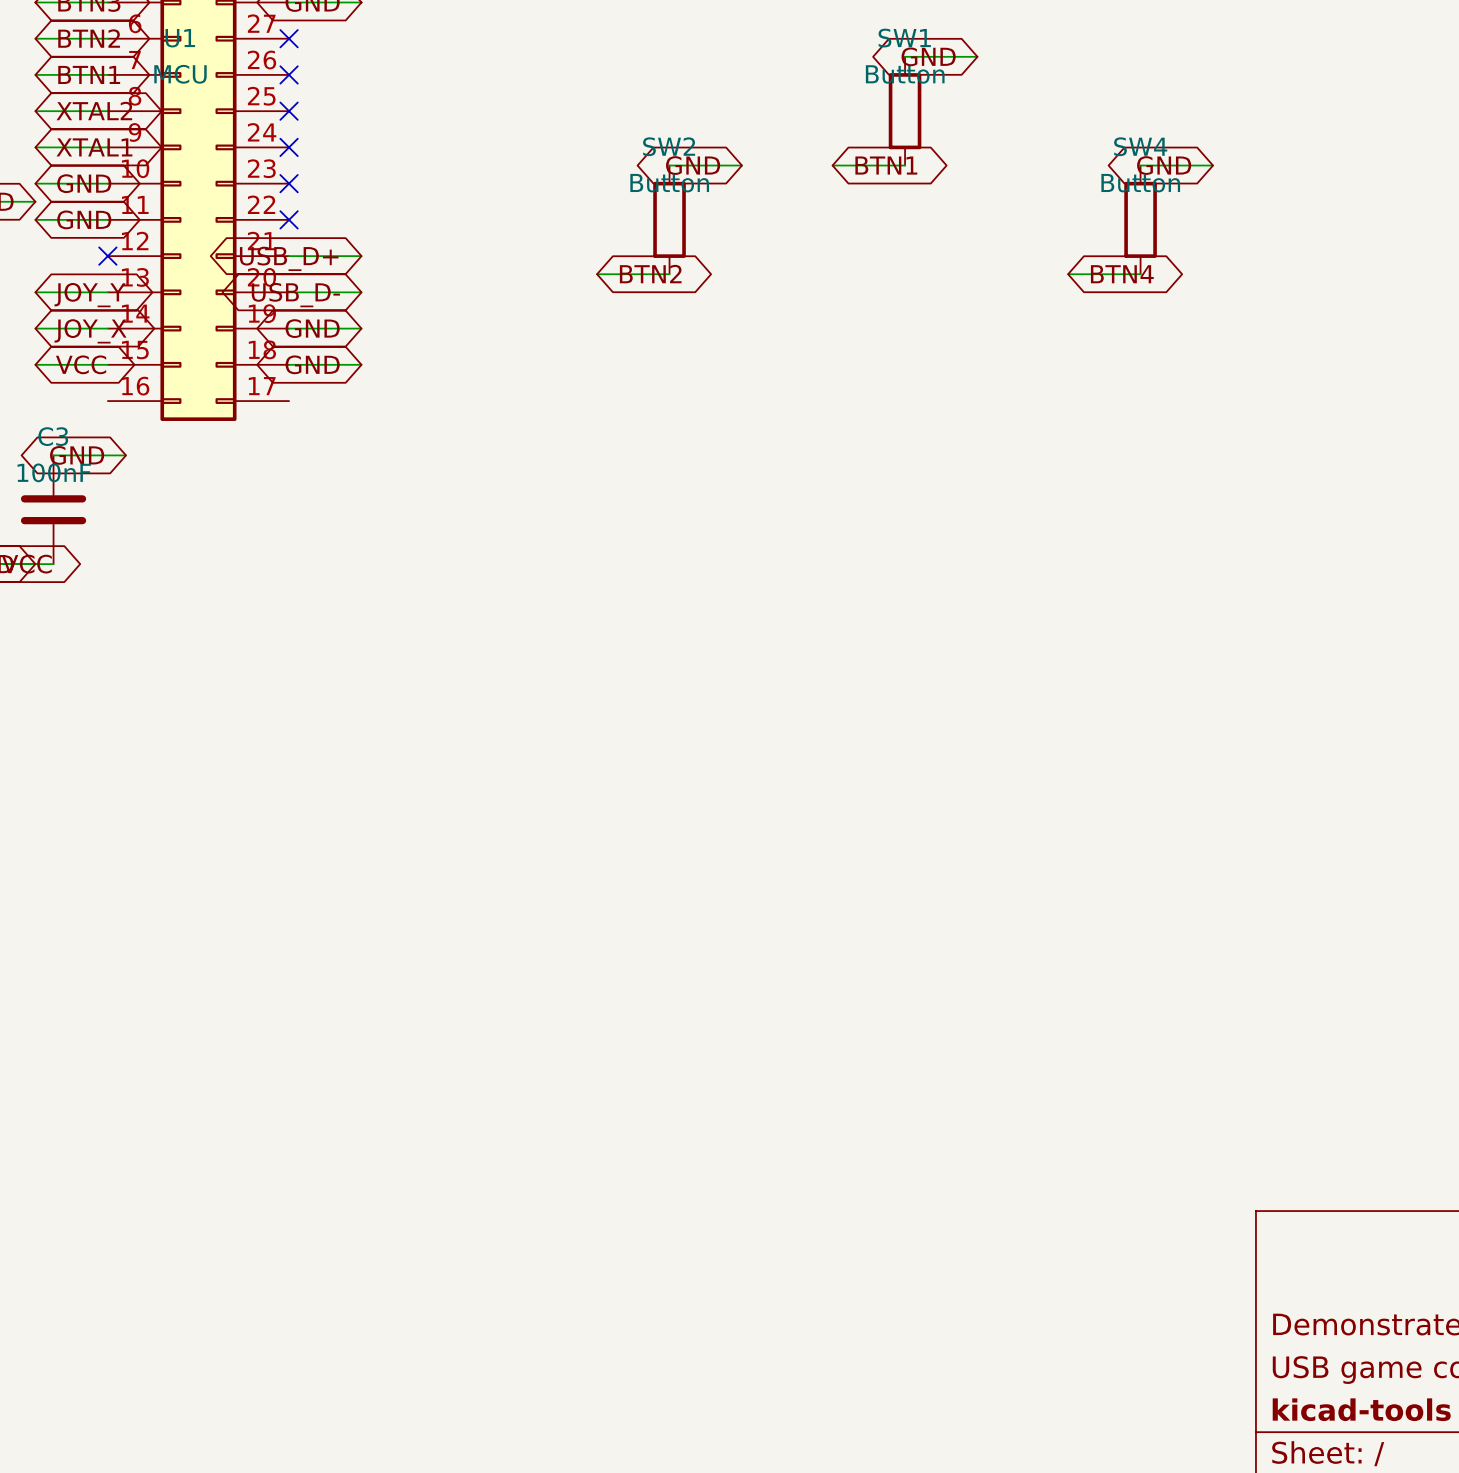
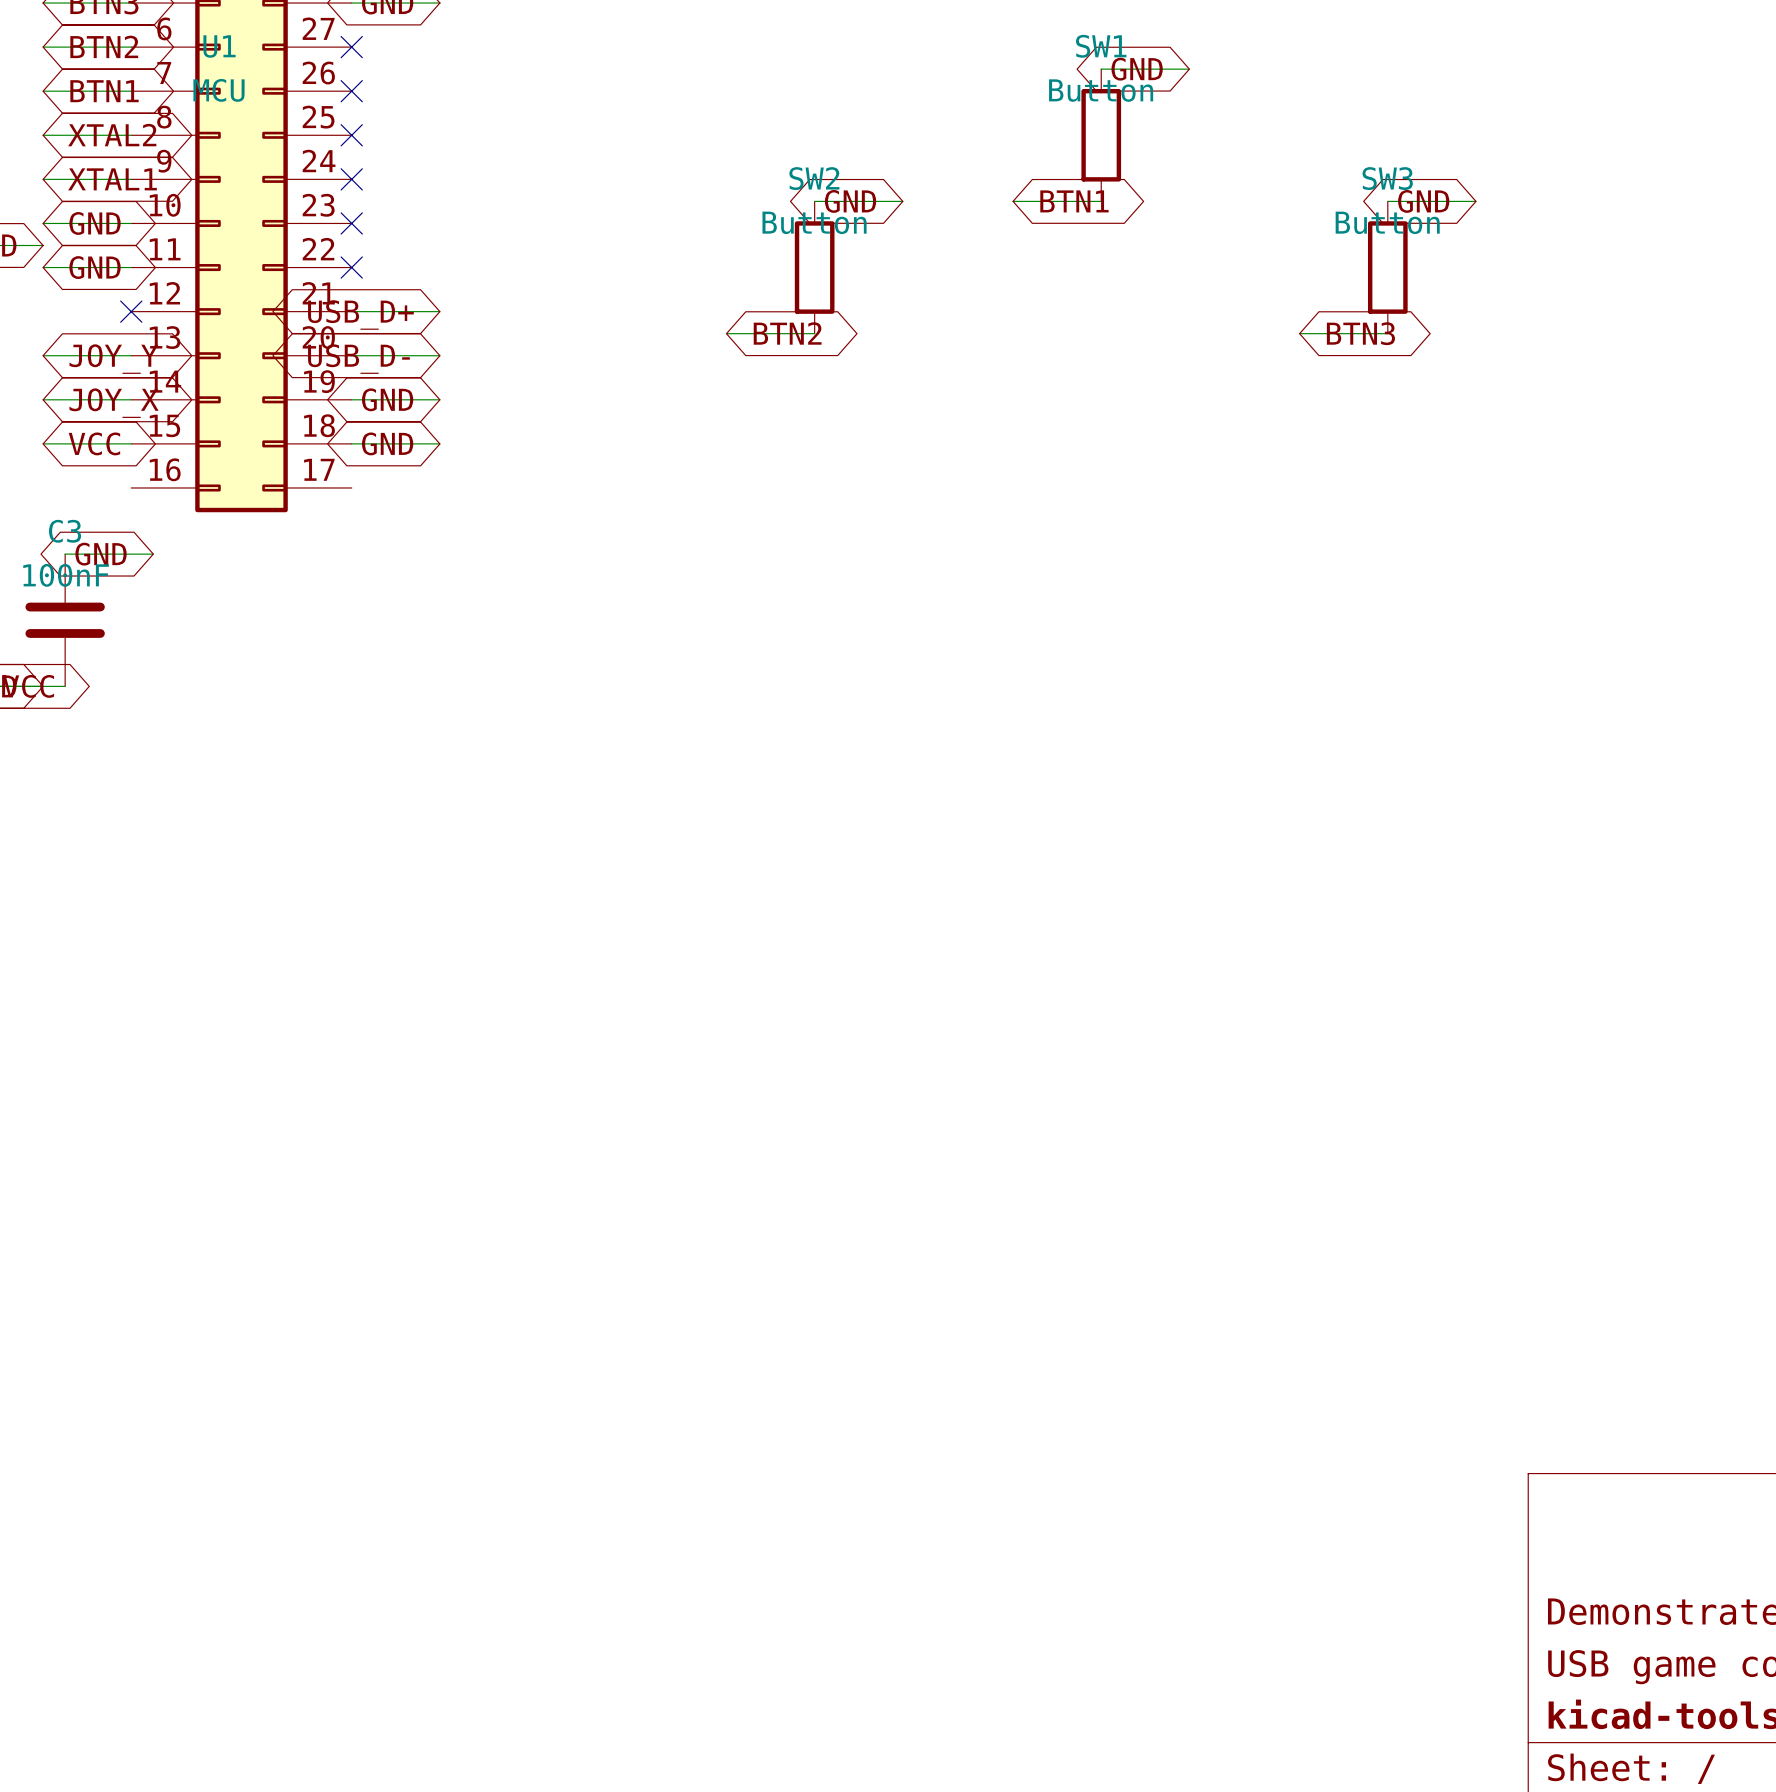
SW4 name: SW4 (1140, 146) -> SW3 (1387, 178)
global label: BTN4 (1122, 274) -> BTN3 (1360, 333)

